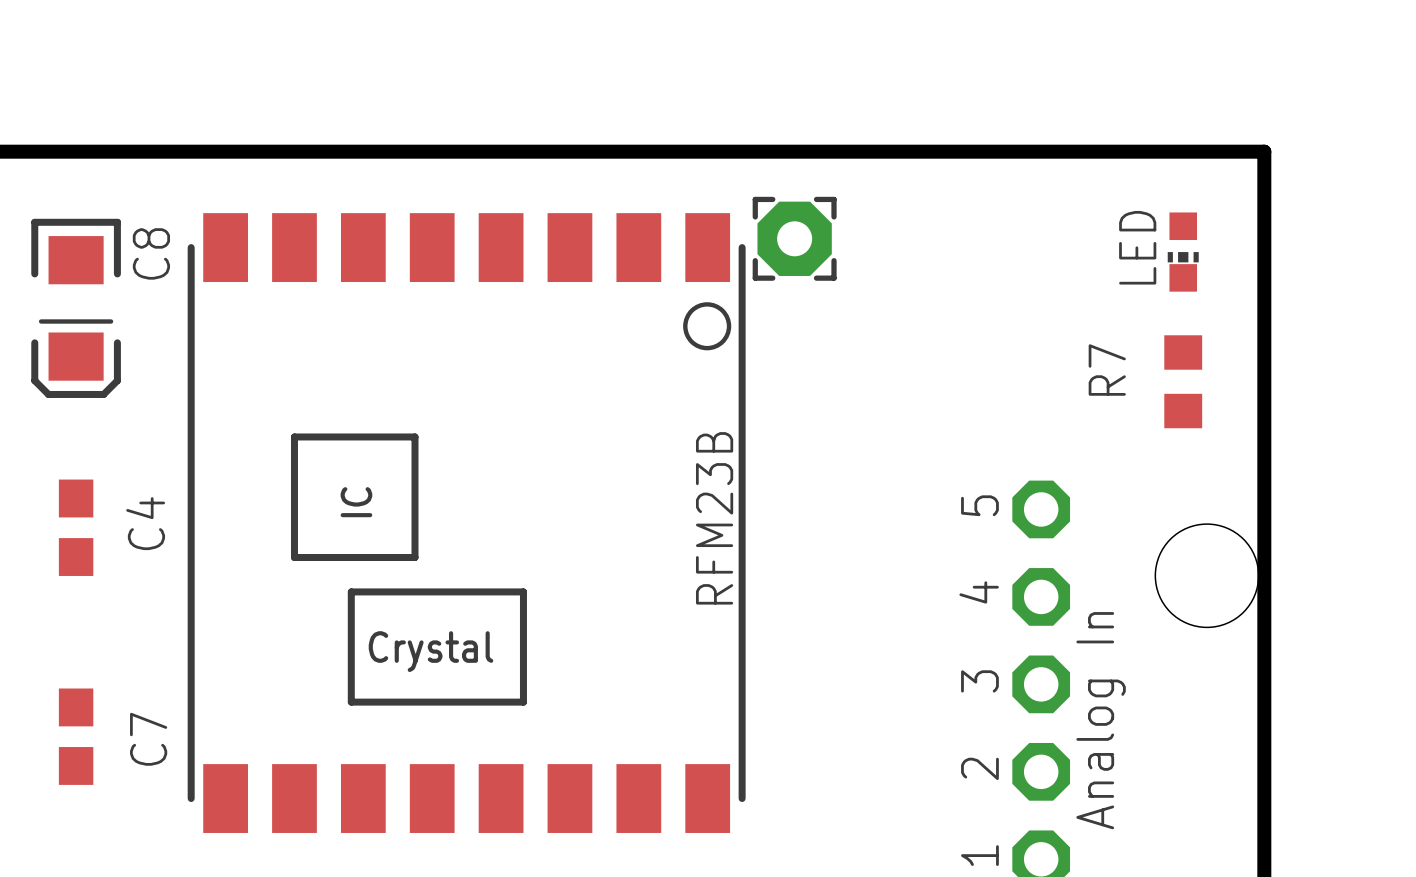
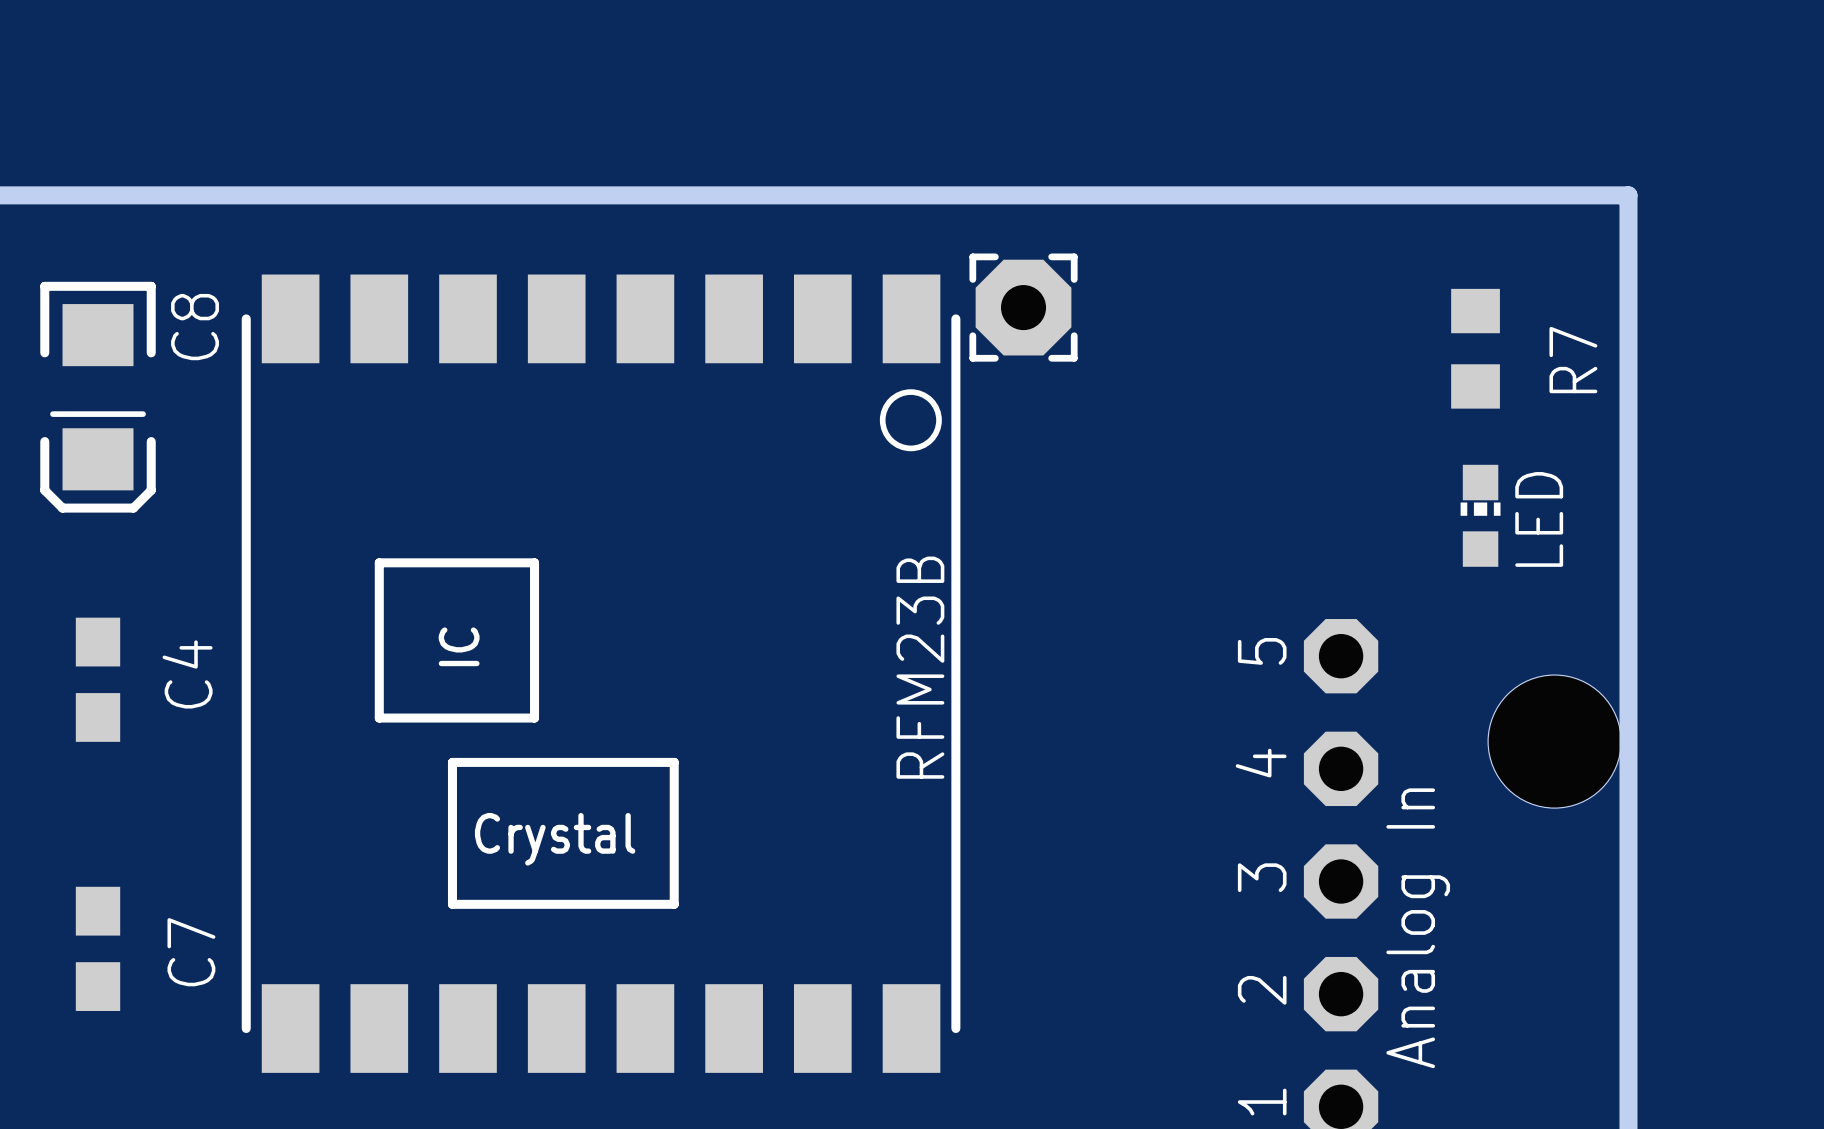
LED rotation: 0° (1183, 252) -> 180° (1480, 515)
LED position: (1183, 252) -> (1480, 515)
R7 name position: R7 (1107, 370) -> R7 (1573, 360)
R7 position: (1183, 381) -> (1475, 348)

